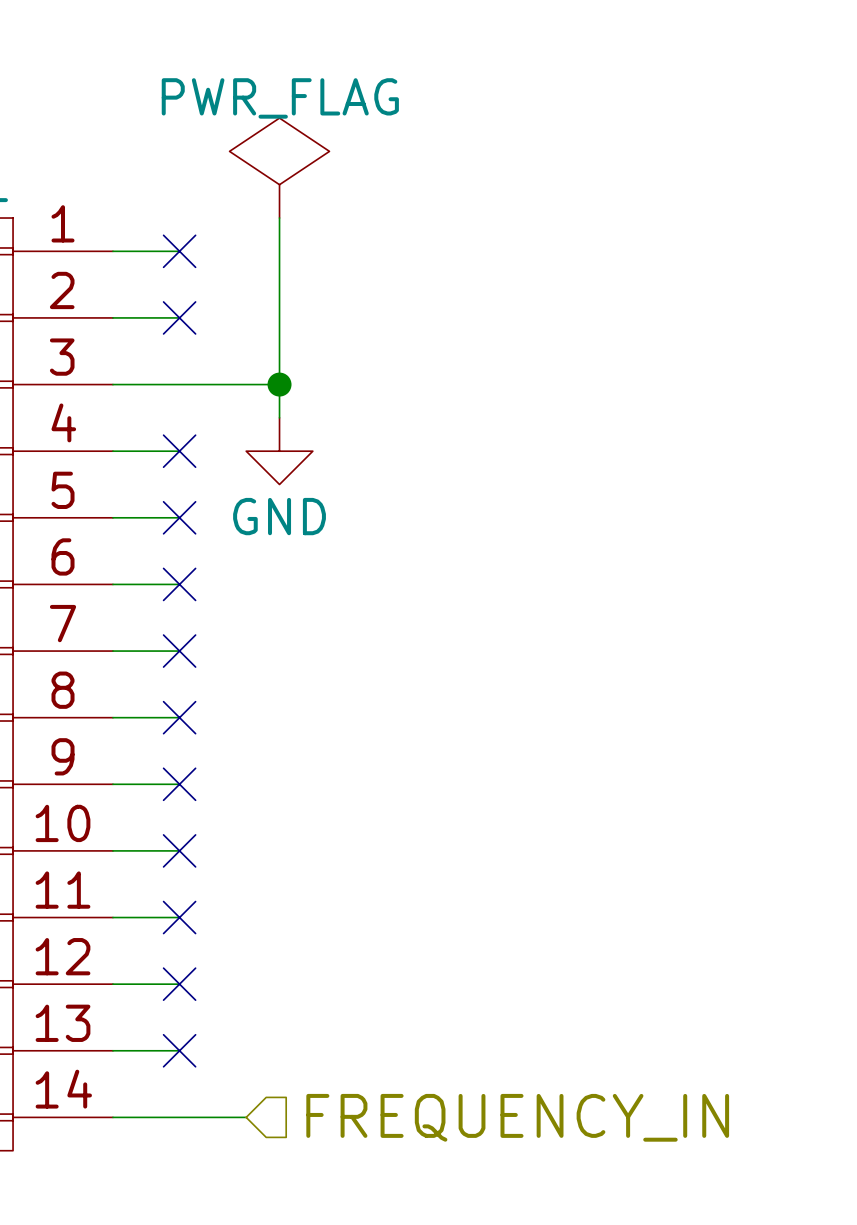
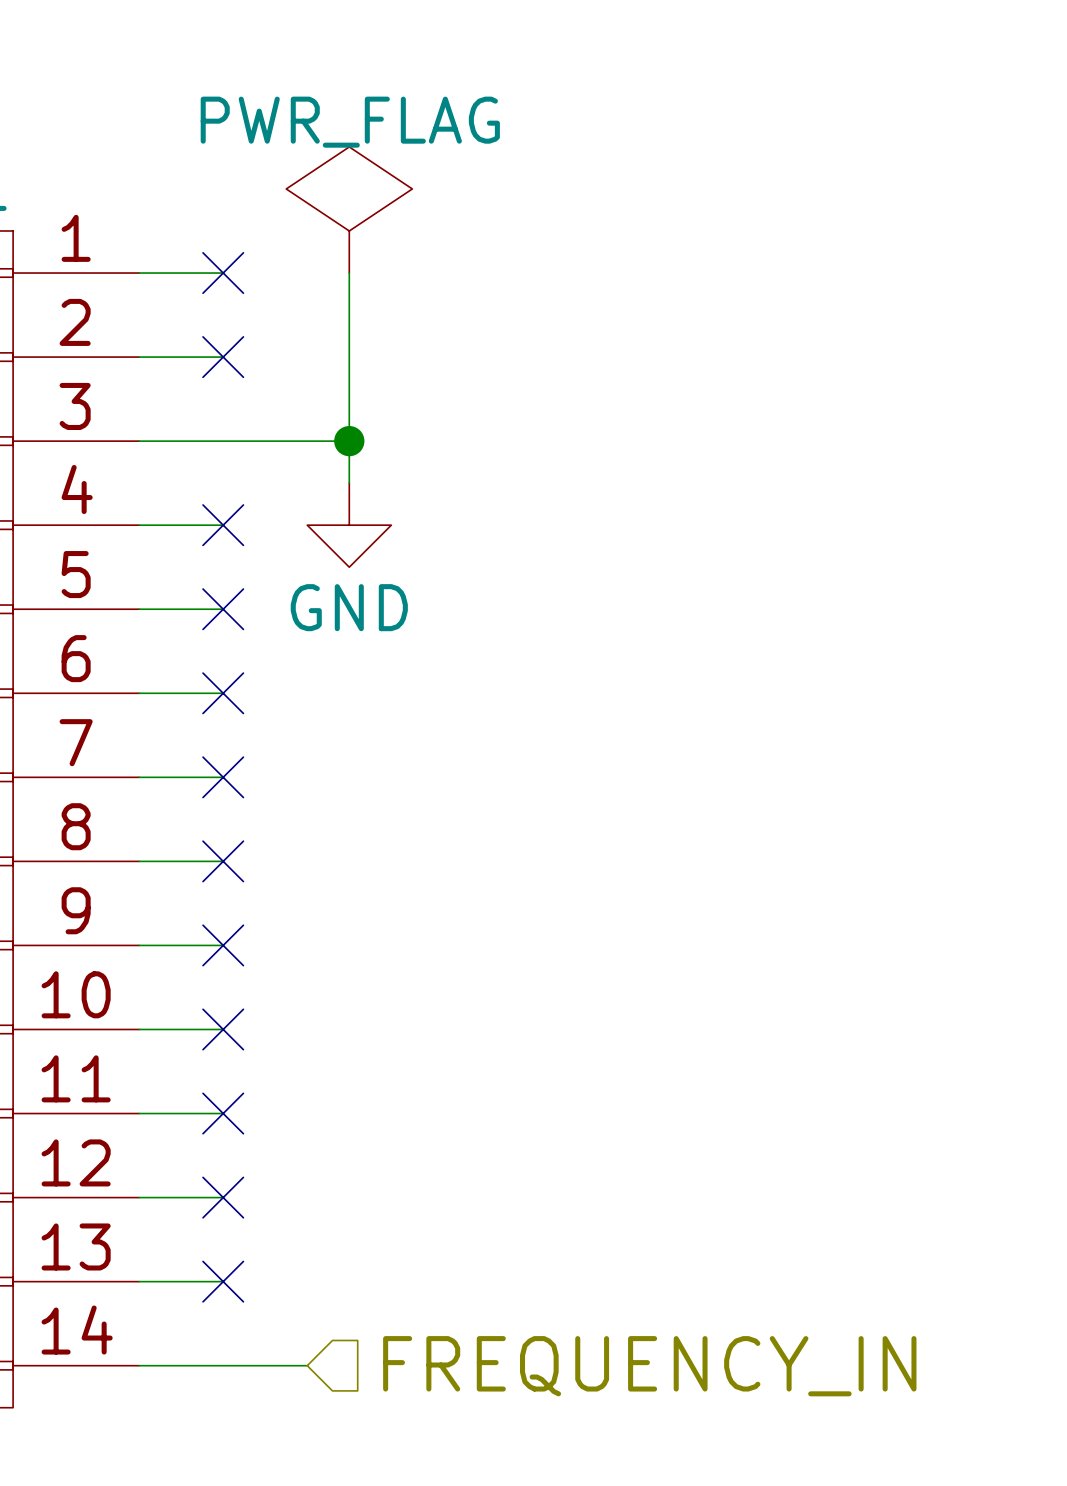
power symbol position: PWR_FLAG (279, 168) -> PWR_FLAG (349, 209)

